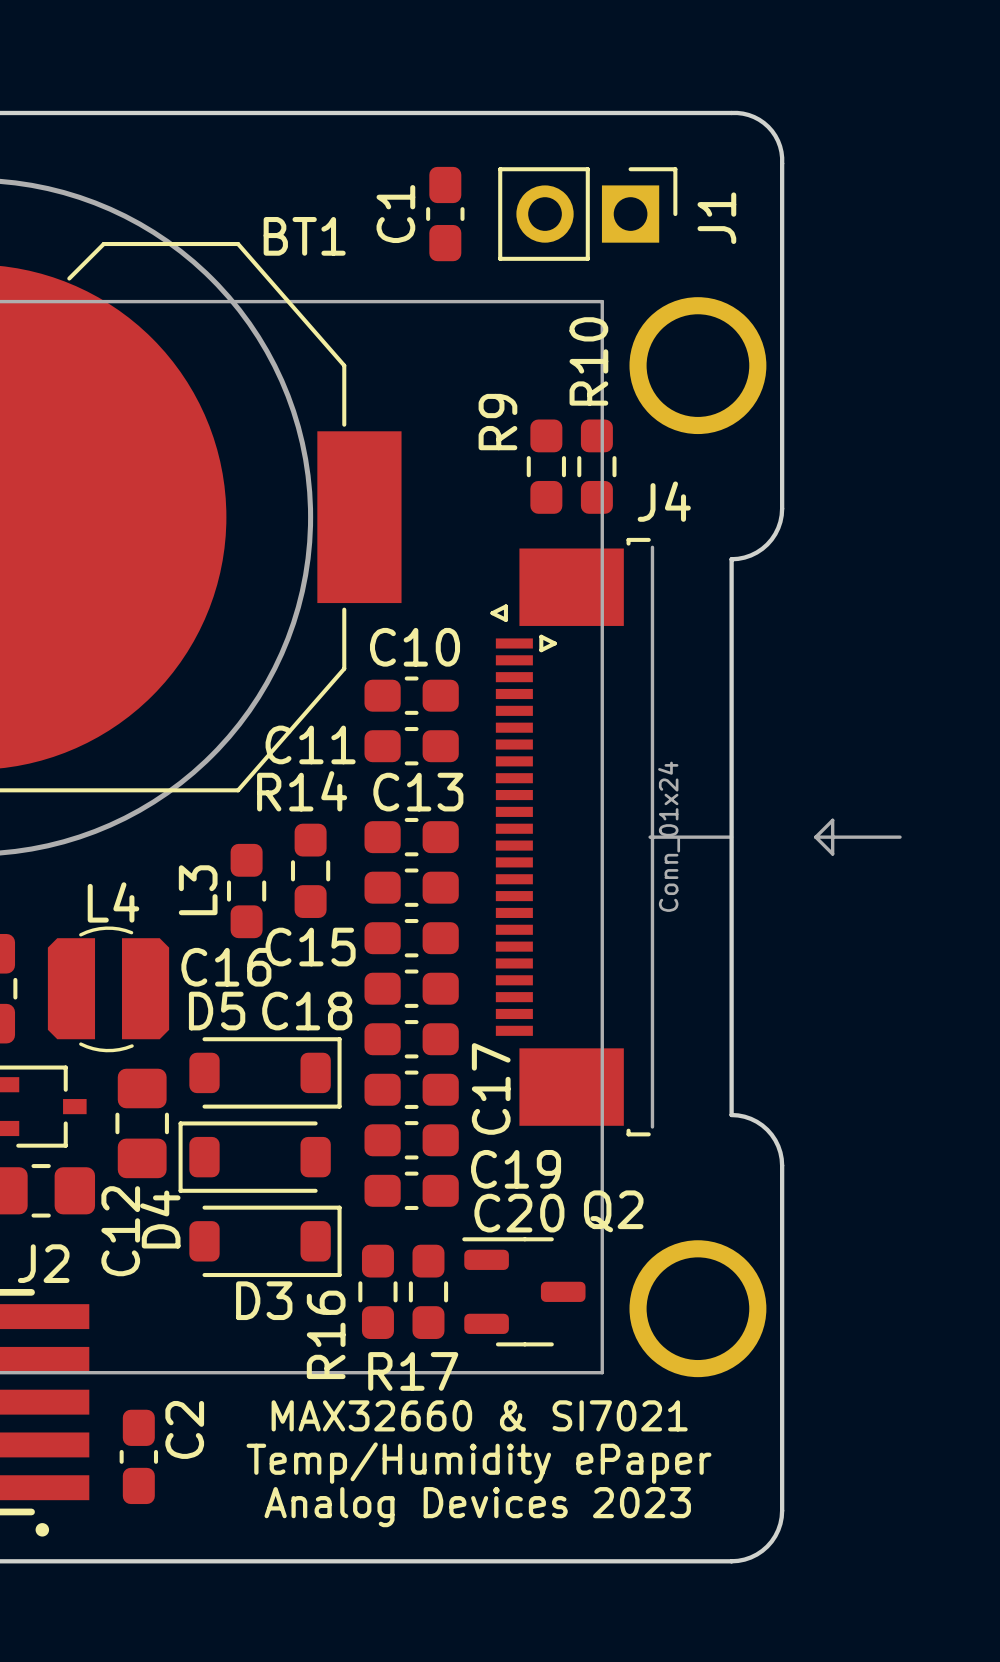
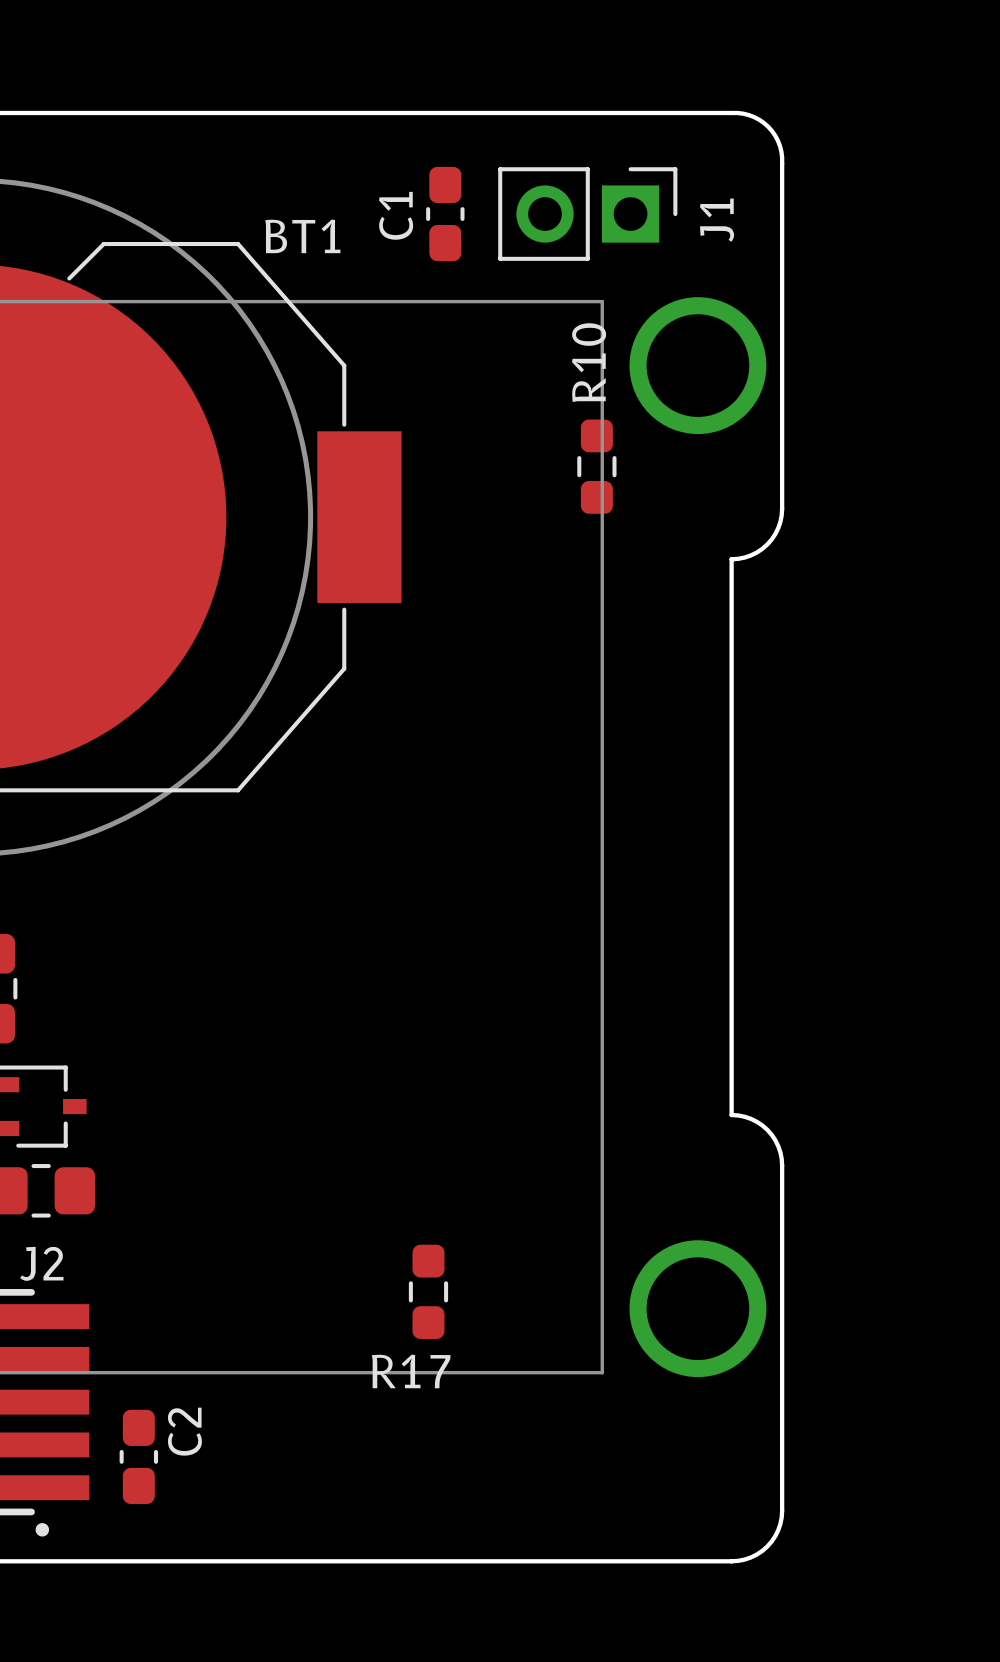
R9: (546, 466) -> none
C10: (411, 695) -> none
C11: (411, 746) -> none
C13: (411, 837) -> none
J4: Conn_01x24 (572, 837) -> none
line: (650, 837) (731, 837) -> none
line: (815, 837) (900, 837) -> none
line: (815, 837) (832, 820) (832, 853) (815, 837) -> none
L3: (310, 870) -> none
part: (411, 887) -> none
R14: (246, 891) -> none
C15: (411, 938) -> none
C16: (411, 988) -> none
L4: (108, 989) -> none
C17: (411, 1039) -> none
D5: (265, 1072) -> none
C18: (411, 1089) -> none
C12: (142, 1123) -> none
C19: (411, 1140) -> none
D4: (254, 1157) -> none
C20: (411, 1190) -> none
D3: (265, 1241) -> none
R16: (377, 1291) -> none
Q2: (523, 1291) -> none
text: MAX32660 & SI7021 (479, 1415) -> none
text: Temp/Humidity ePaper (479, 1463) -> none
text: Analog Devices 2023 (477, 1507) -> none

